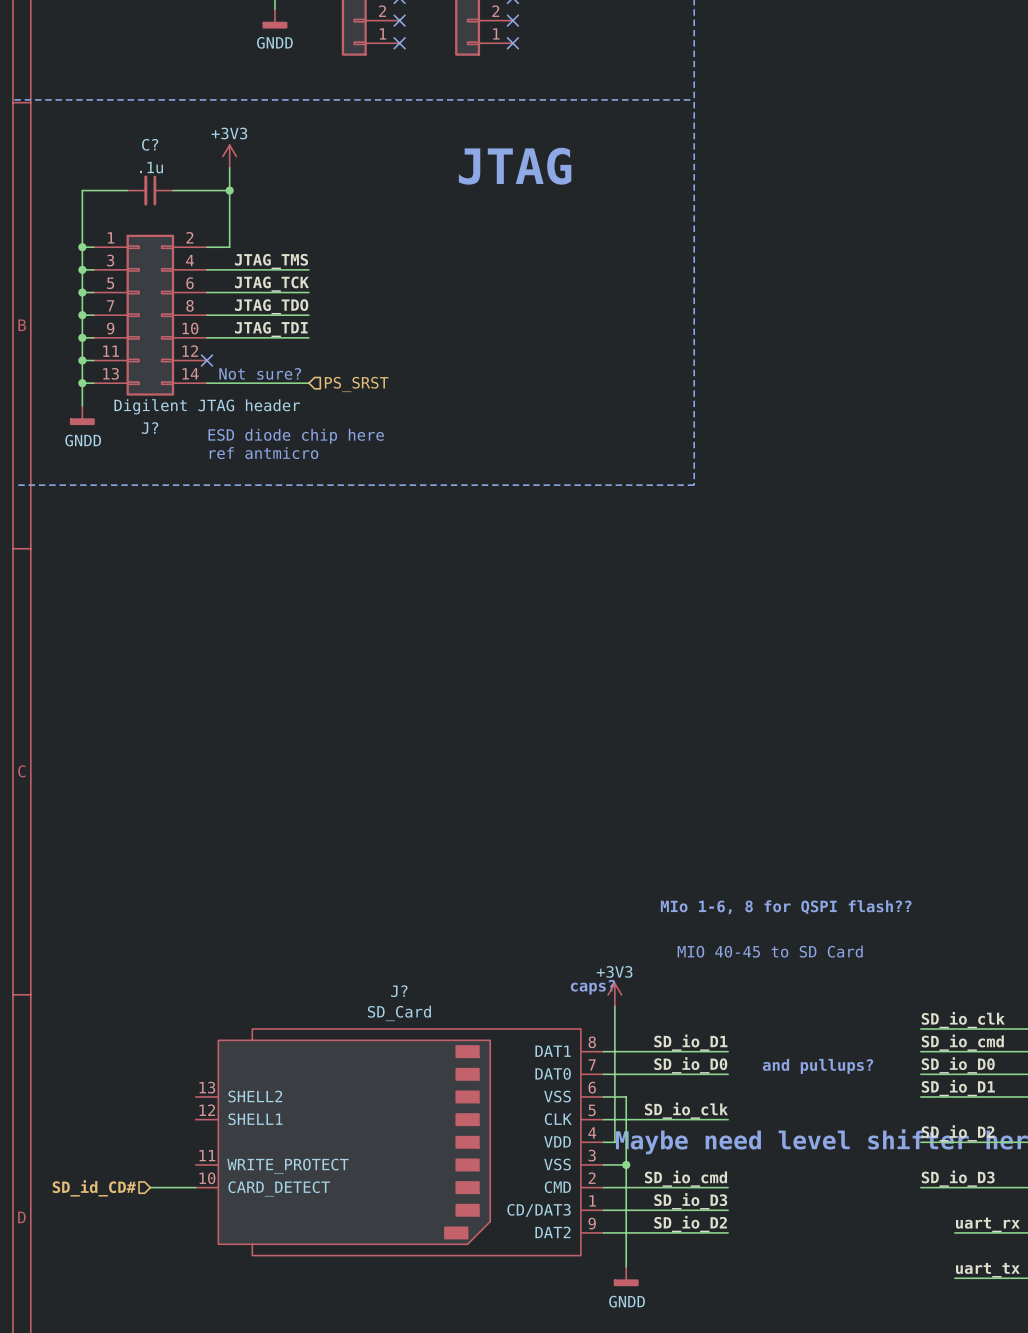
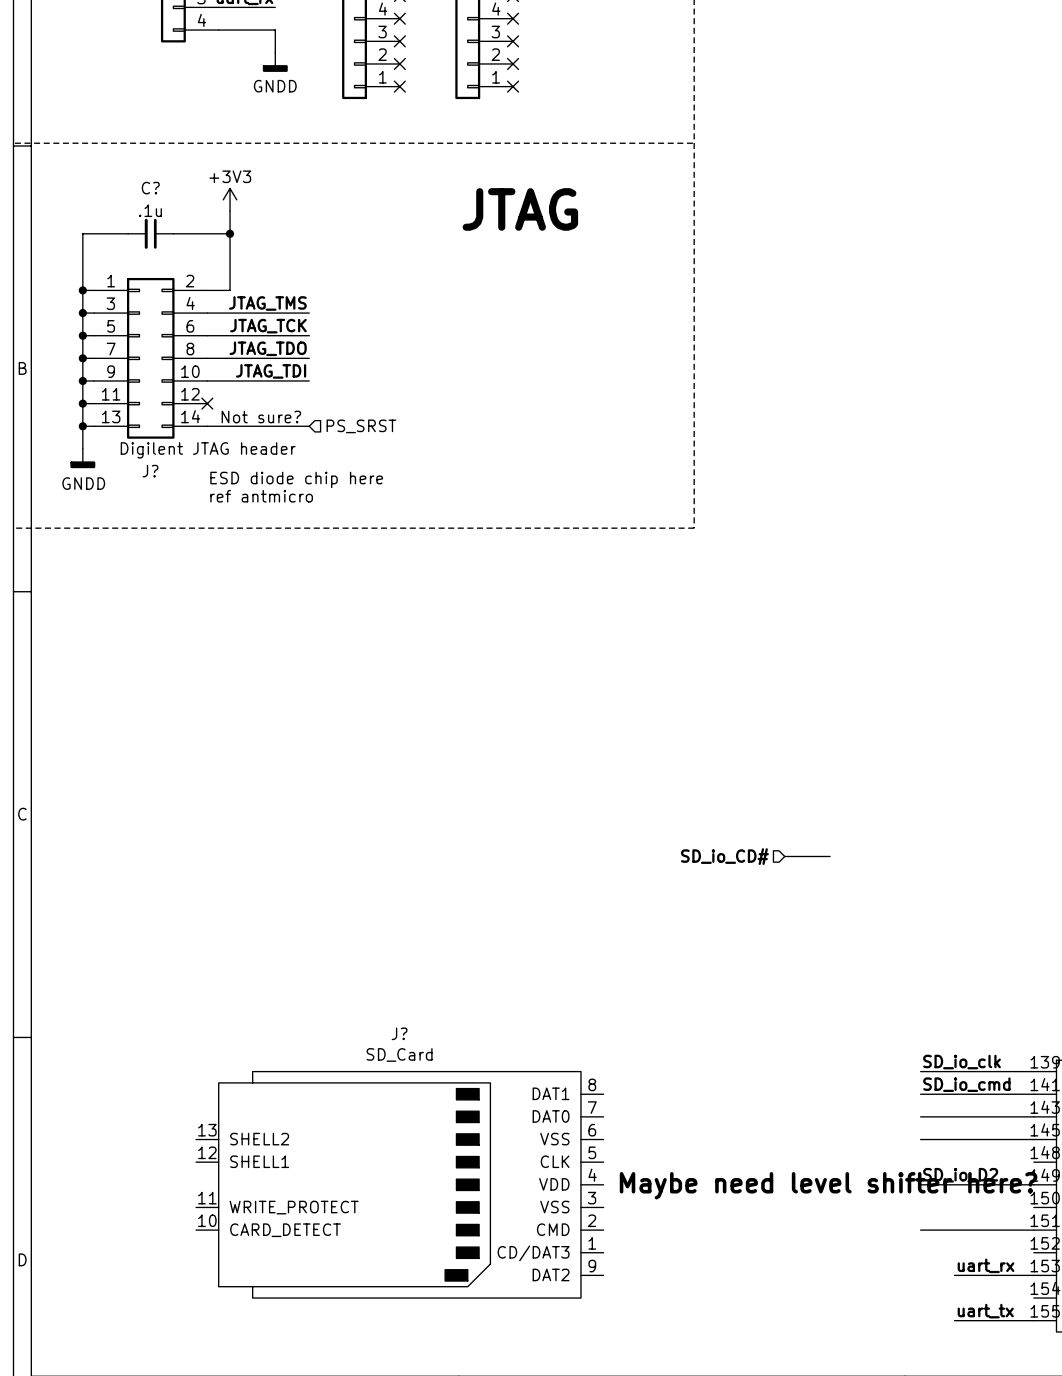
wire: none -> (784, 856) (830, 856)
hierarchical label: none -> SD_io_CD# (724, 856)
text: MIo 1-6, 8 for QSPI flash?? (786, 907) -> none
text: MIO 40-45 to SD Card (770, 951) -> none
text: caps? (592, 987) -> none
power symbol: +3V3 (614, 995) -> none
wire: (614, 1006) (614, 1142) (603, 1142) -> none
label: SD_io_D1 (690, 1042) -> none
wire: (603, 1051) (728, 1051) -> none
label: SD_io_D0 (690, 1065) -> none
label: SD_io_D0 (958, 1065) -> none
text: and pullups? (818, 1066) -> none
wire: (603, 1074) (728, 1074) -> none
label: SD_io_D1 (958, 1088) -> none
wire: (603, 1096) (626, 1096) (626, 1266) -> none
label: SD_io_clk (686, 1110) -> none
wire: (603, 1119) (728, 1119) -> none
wire: (603, 1164) (626, 1164) -> none
junction: (626, 1164) -> none
label: SD_io_cmd (686, 1178) -> none
label: SD_io_D3 (958, 1178) -> none
wire: (150, 1187) (195, 1187) -> none
wire: (603, 1187) (728, 1187) -> none
hierarchical label: SD_id_CD# (94, 1188) -> none
label: SD_io_D3 (690, 1201) -> none
wire: (603, 1210) (728, 1210) -> none
label: SD_io_D2 (690, 1224) -> none
wire: (603, 1232) (728, 1232) -> none
power symbol: GNDD (626, 1276) -> none

